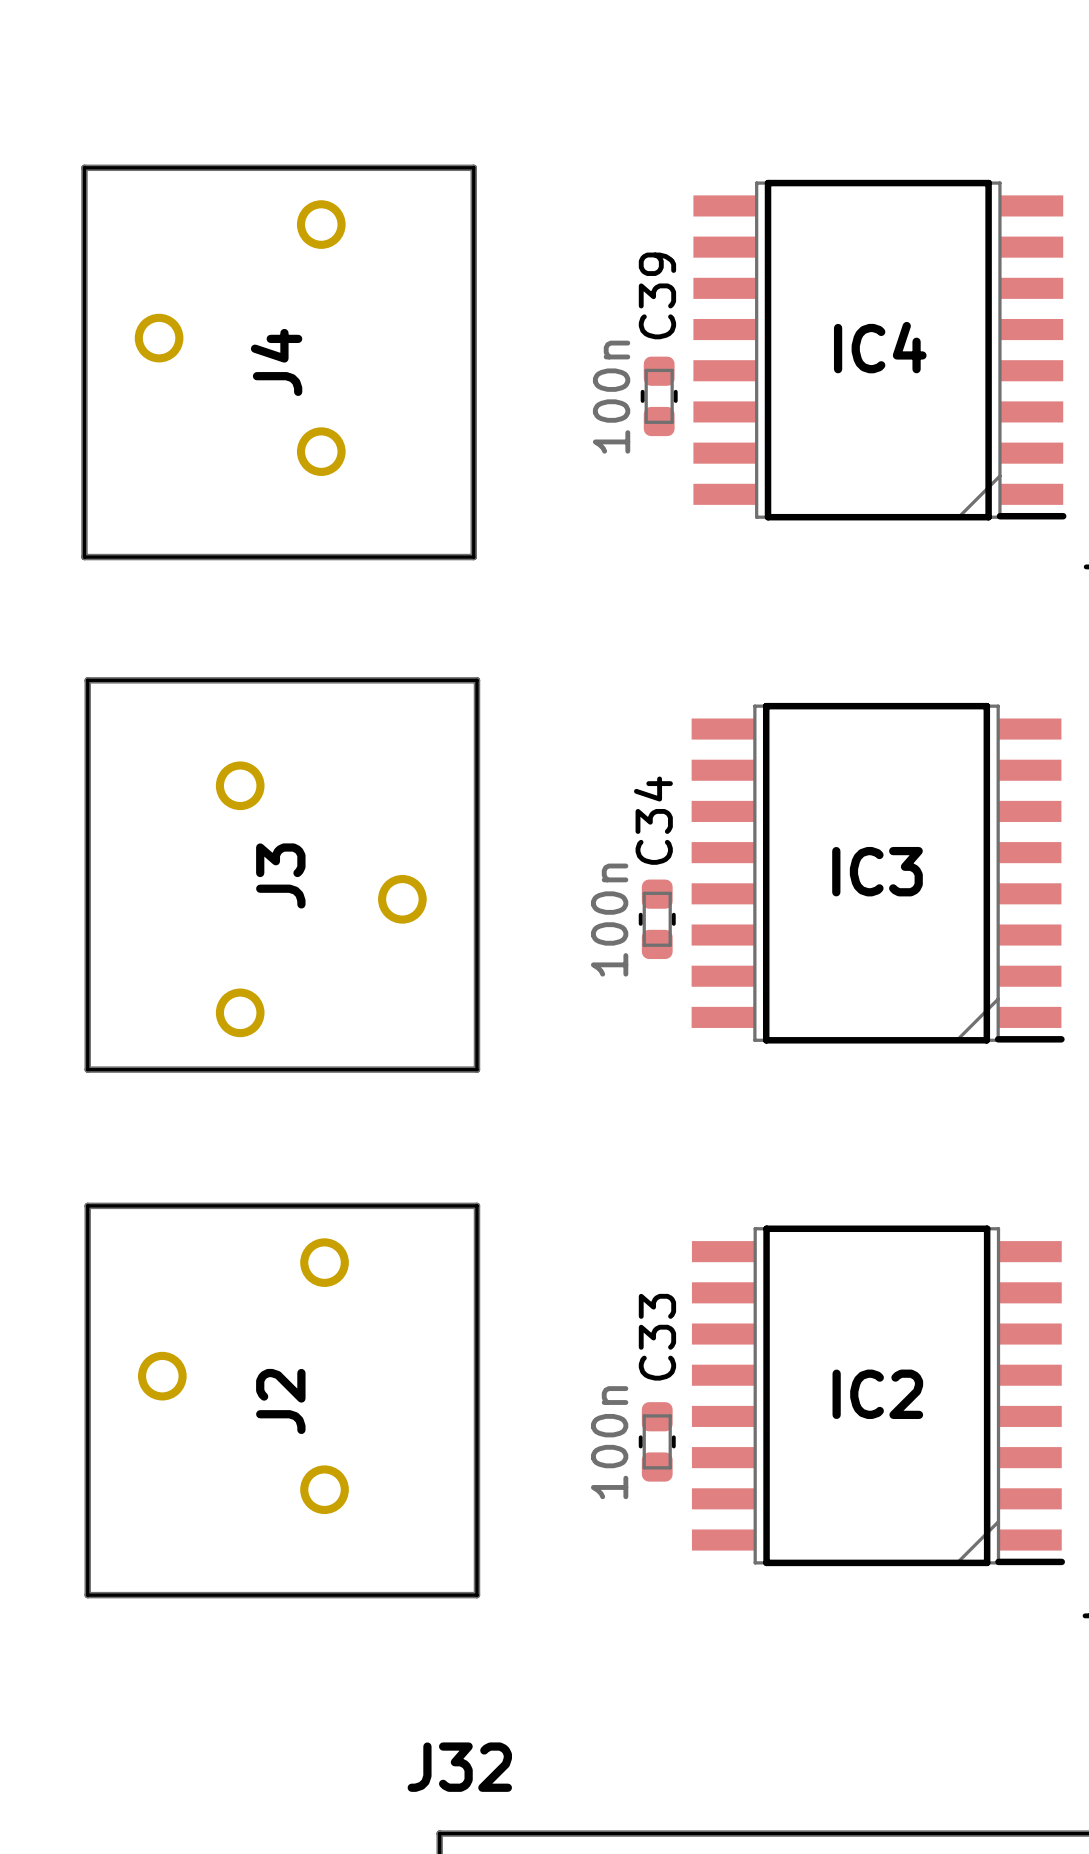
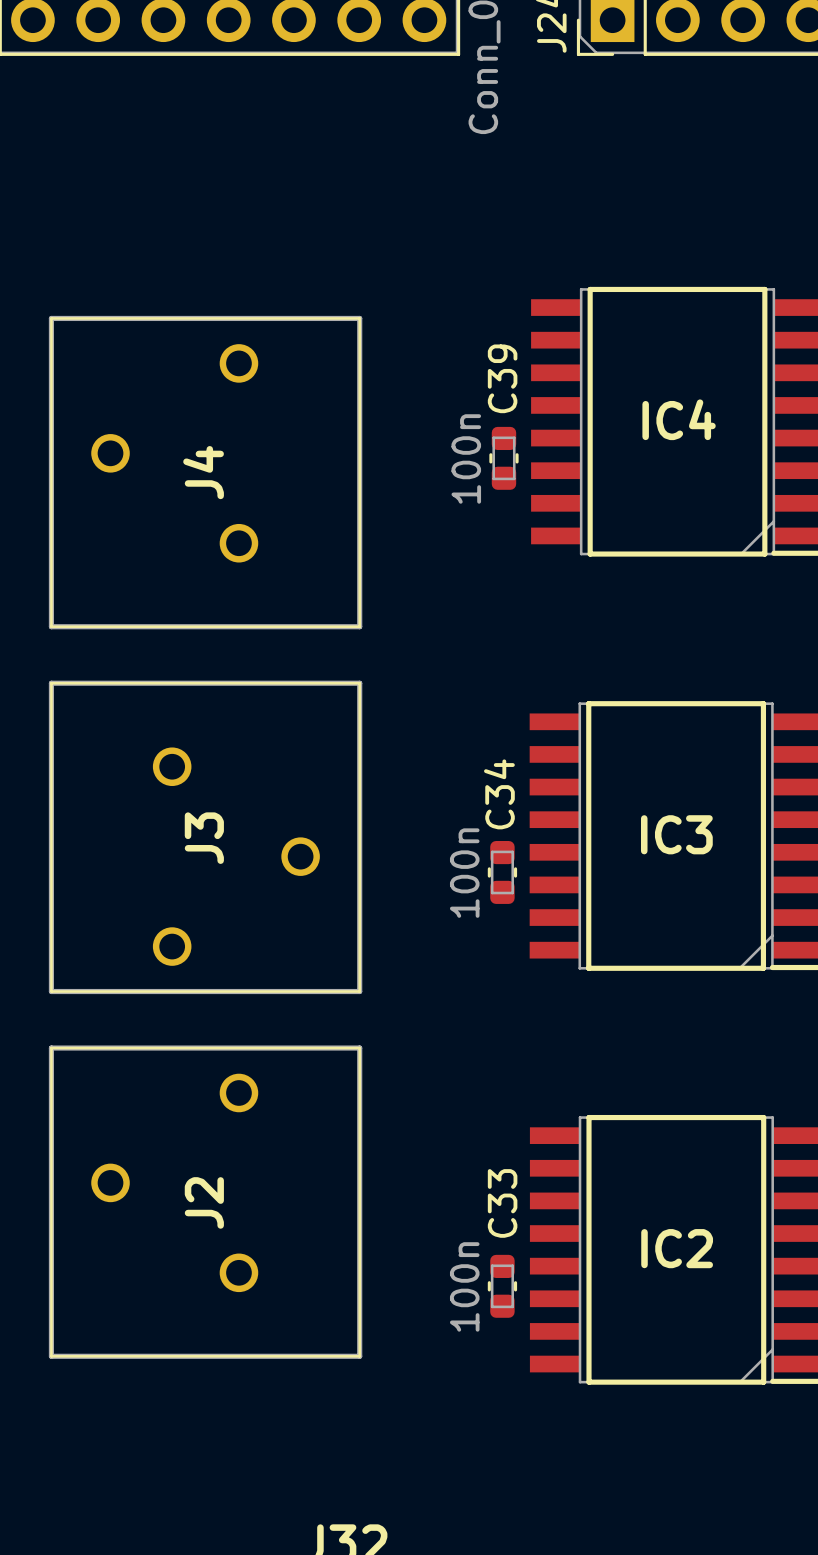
J4 position: (279, 362) -> (205, 472)
J2 position: (282, 1400) -> (205, 1202)

